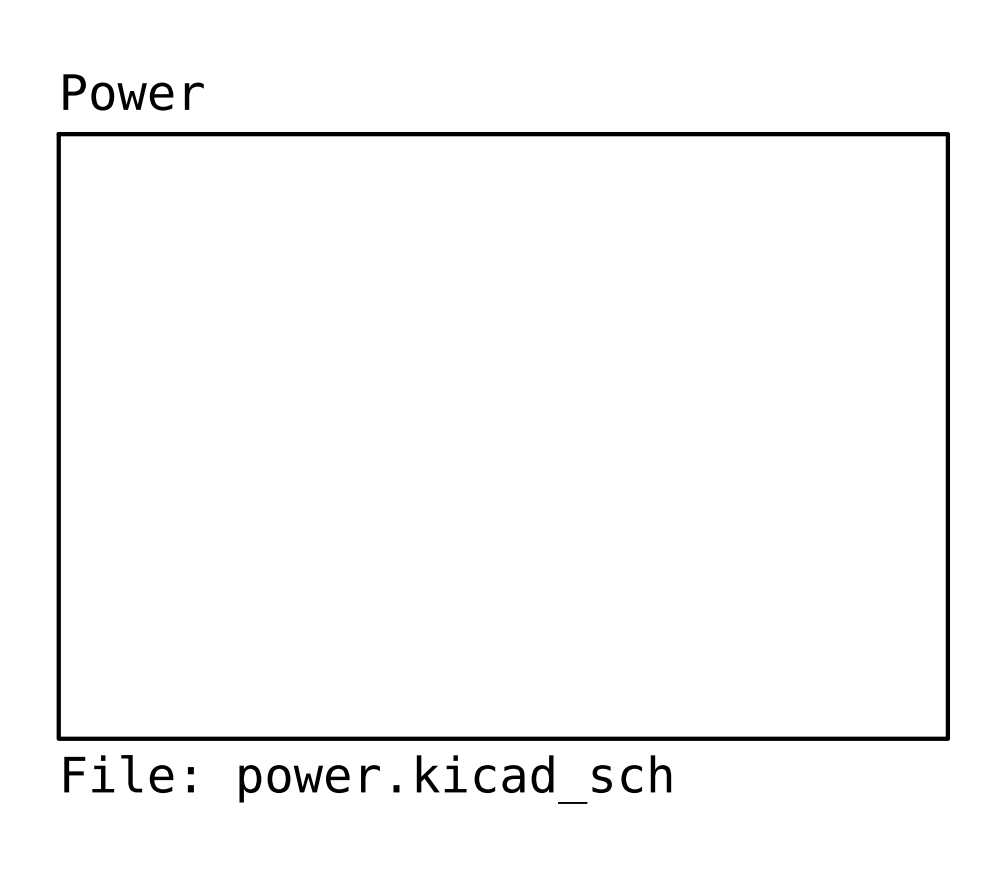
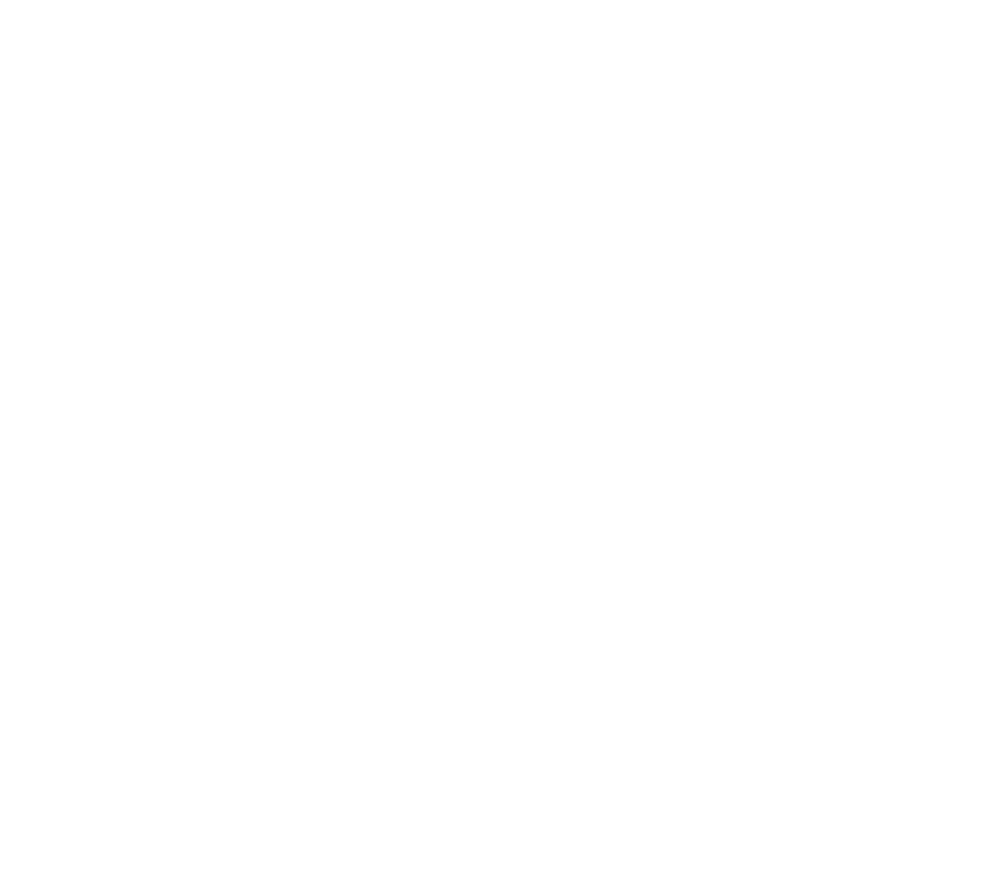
sheet Power: File: power.kicad_sch (503, 436) -> none

